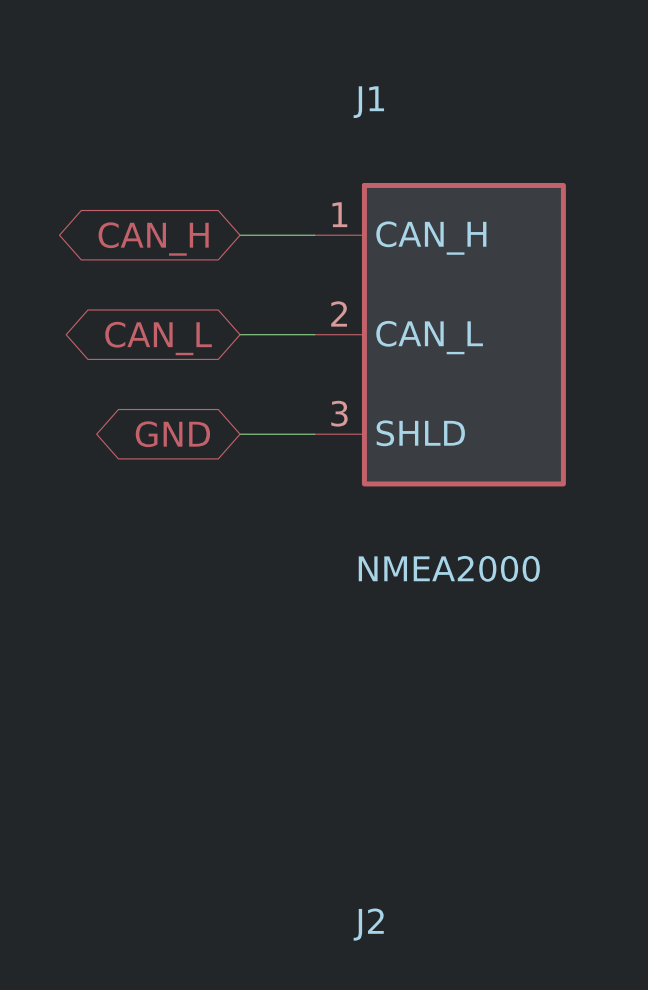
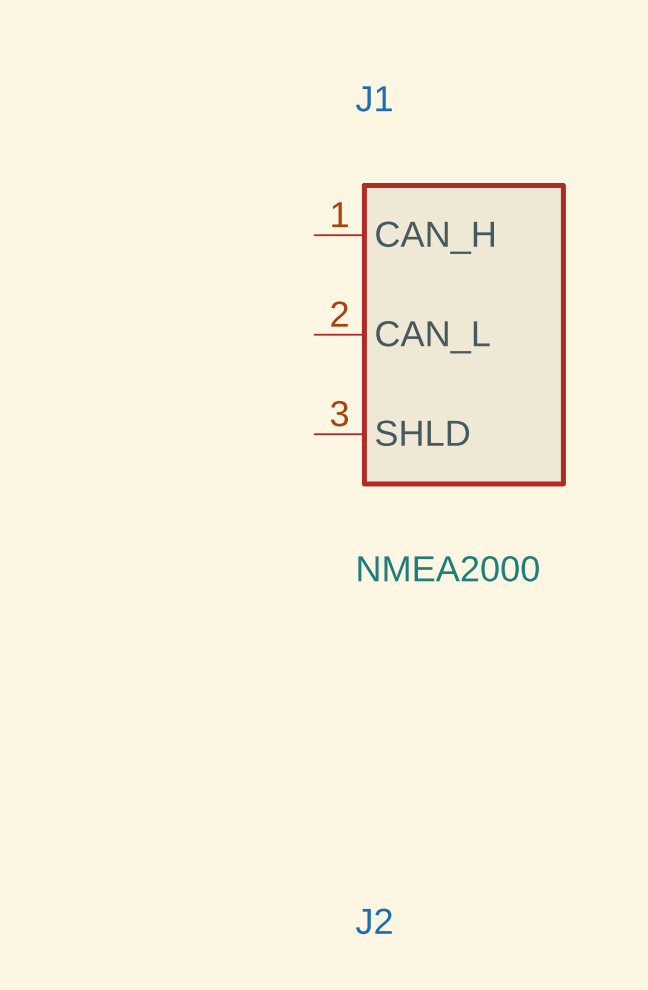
wire: (240, 235) (314, 235) -> none
global label: CAN_H (153, 239) -> none
wire: (240, 334) (314, 334) -> none
global label: CAN_L (158, 338) -> none
global label: GND (172, 434) -> none
wire: (240, 434) (314, 434) -> none

